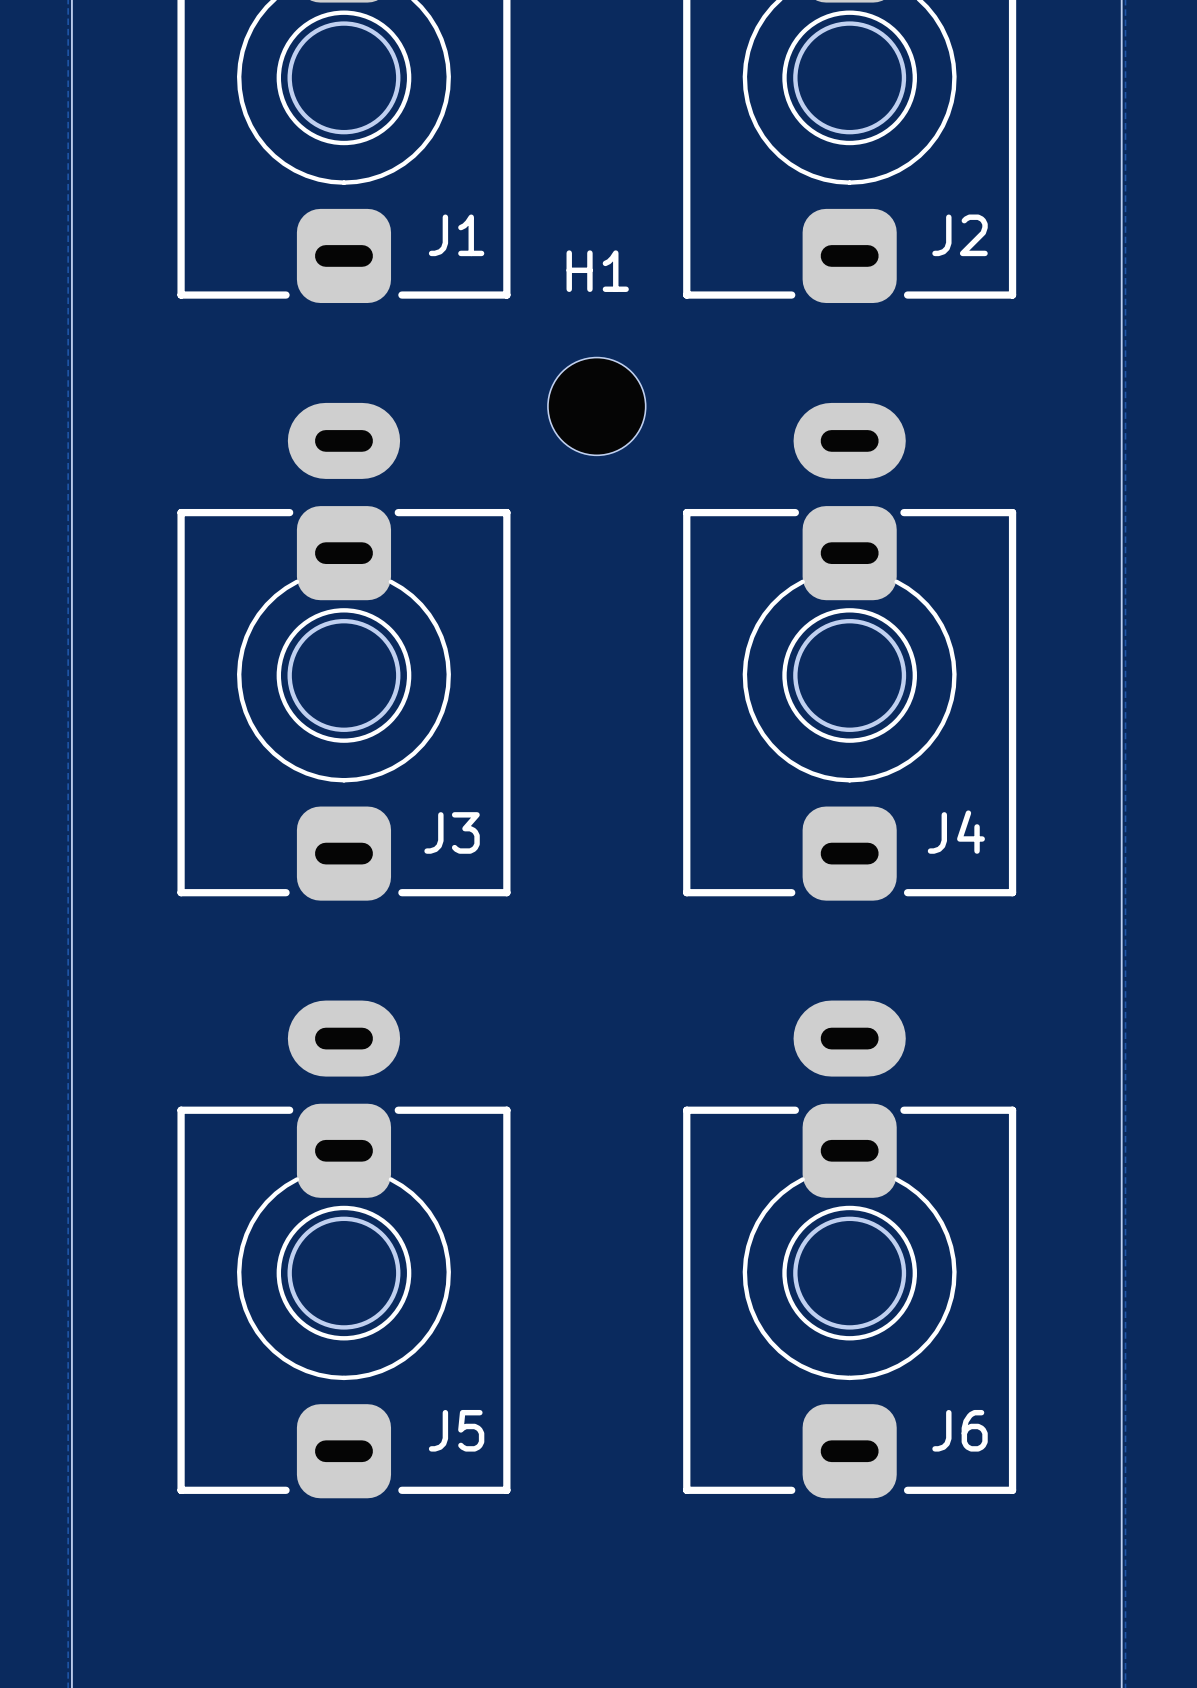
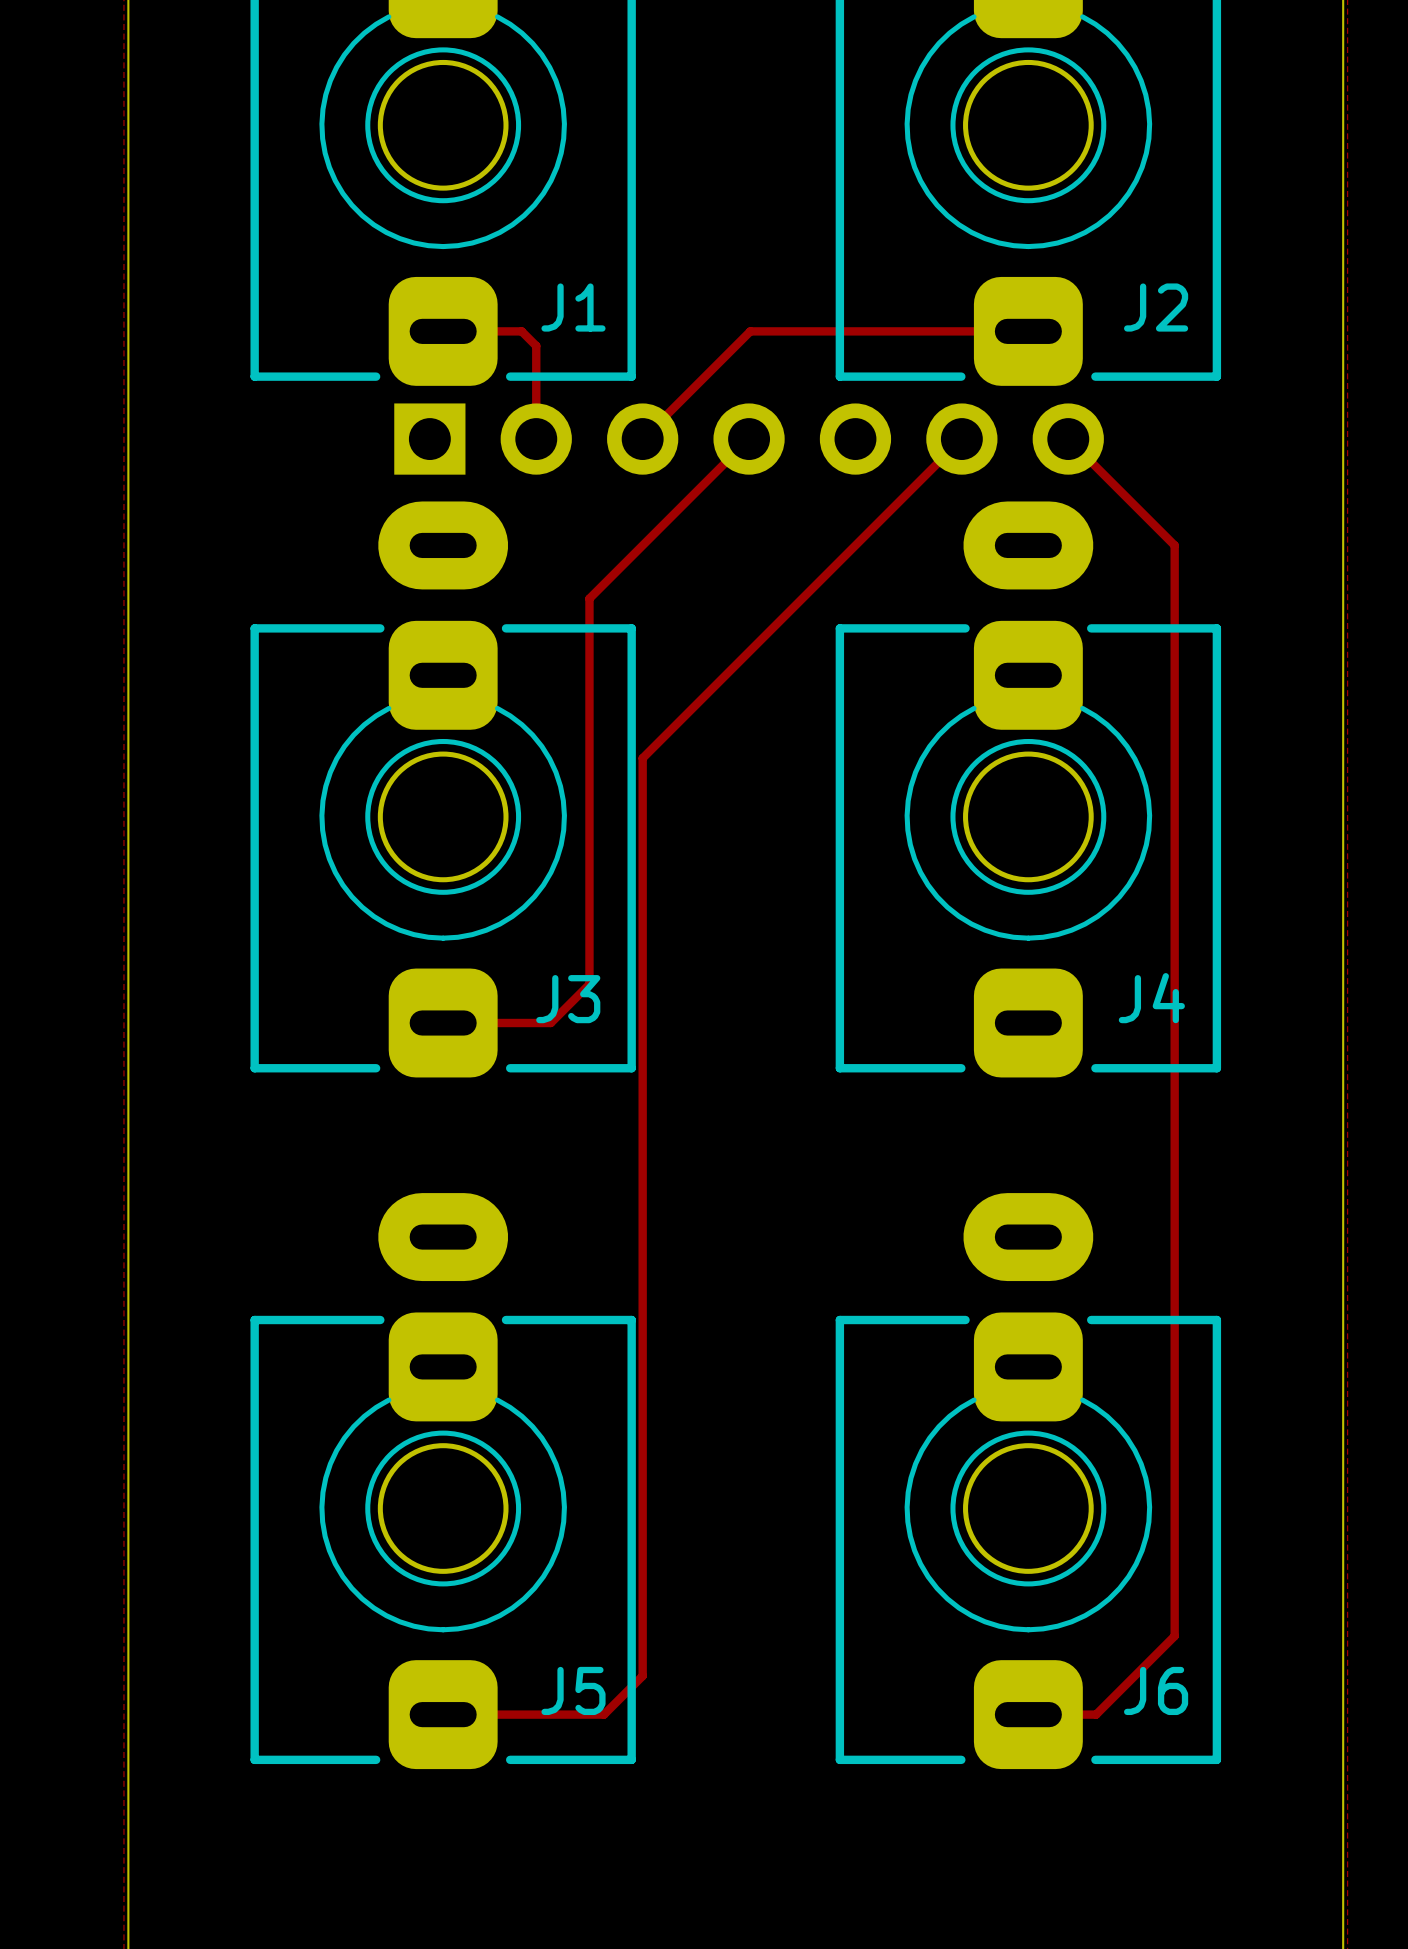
track: none -> (443, 331) (521, 331) (536, 345) (536, 439)
track: none -> (1028, 331) (750, 331) (642, 439)
track: none -> (749, 439) (589, 598) (589, 984) (550, 1023) (443, 1023)
part: none -> (749, 439)
track: none -> (961, 439) (642, 758) (642, 1675) (604, 1714) (443, 1714)
track: none -> (1068, 439) (1174, 545) (1174, 1636) (1096, 1714) (1028, 1714)
H1: (596, 406) -> none

